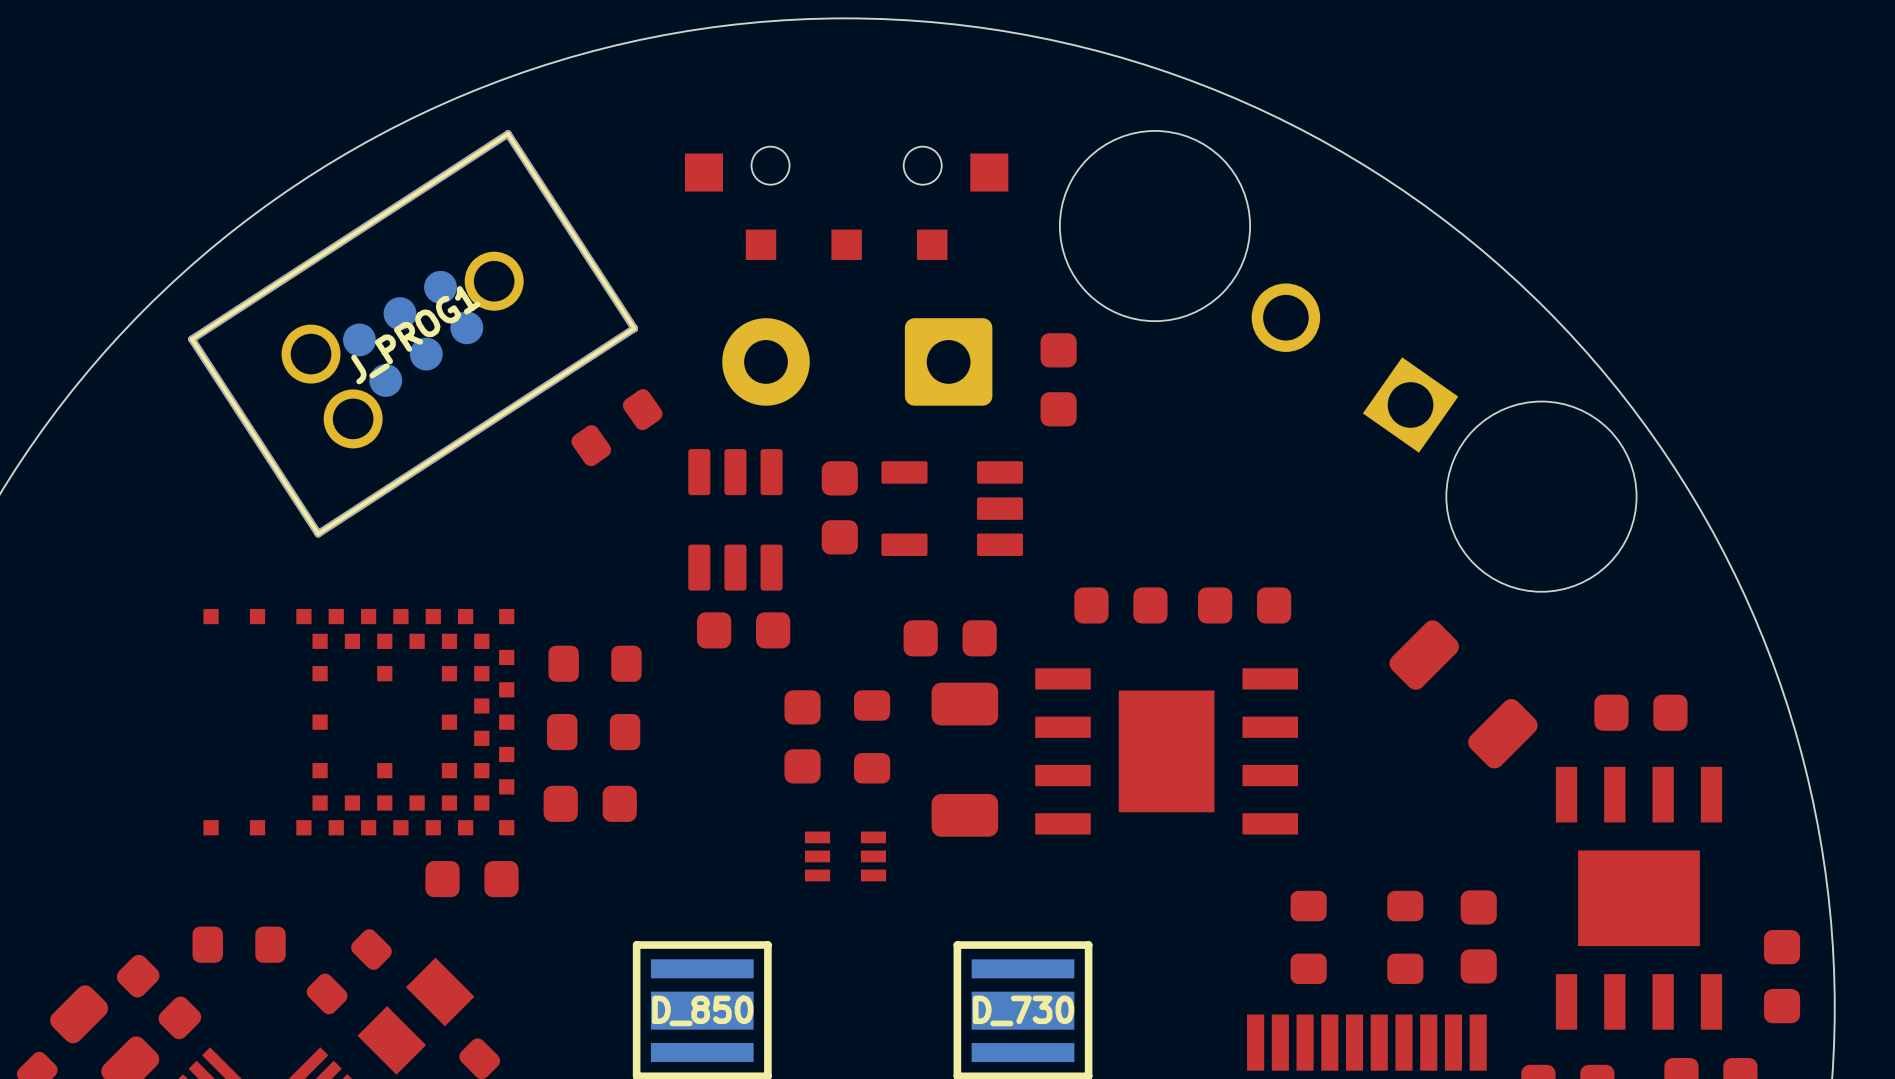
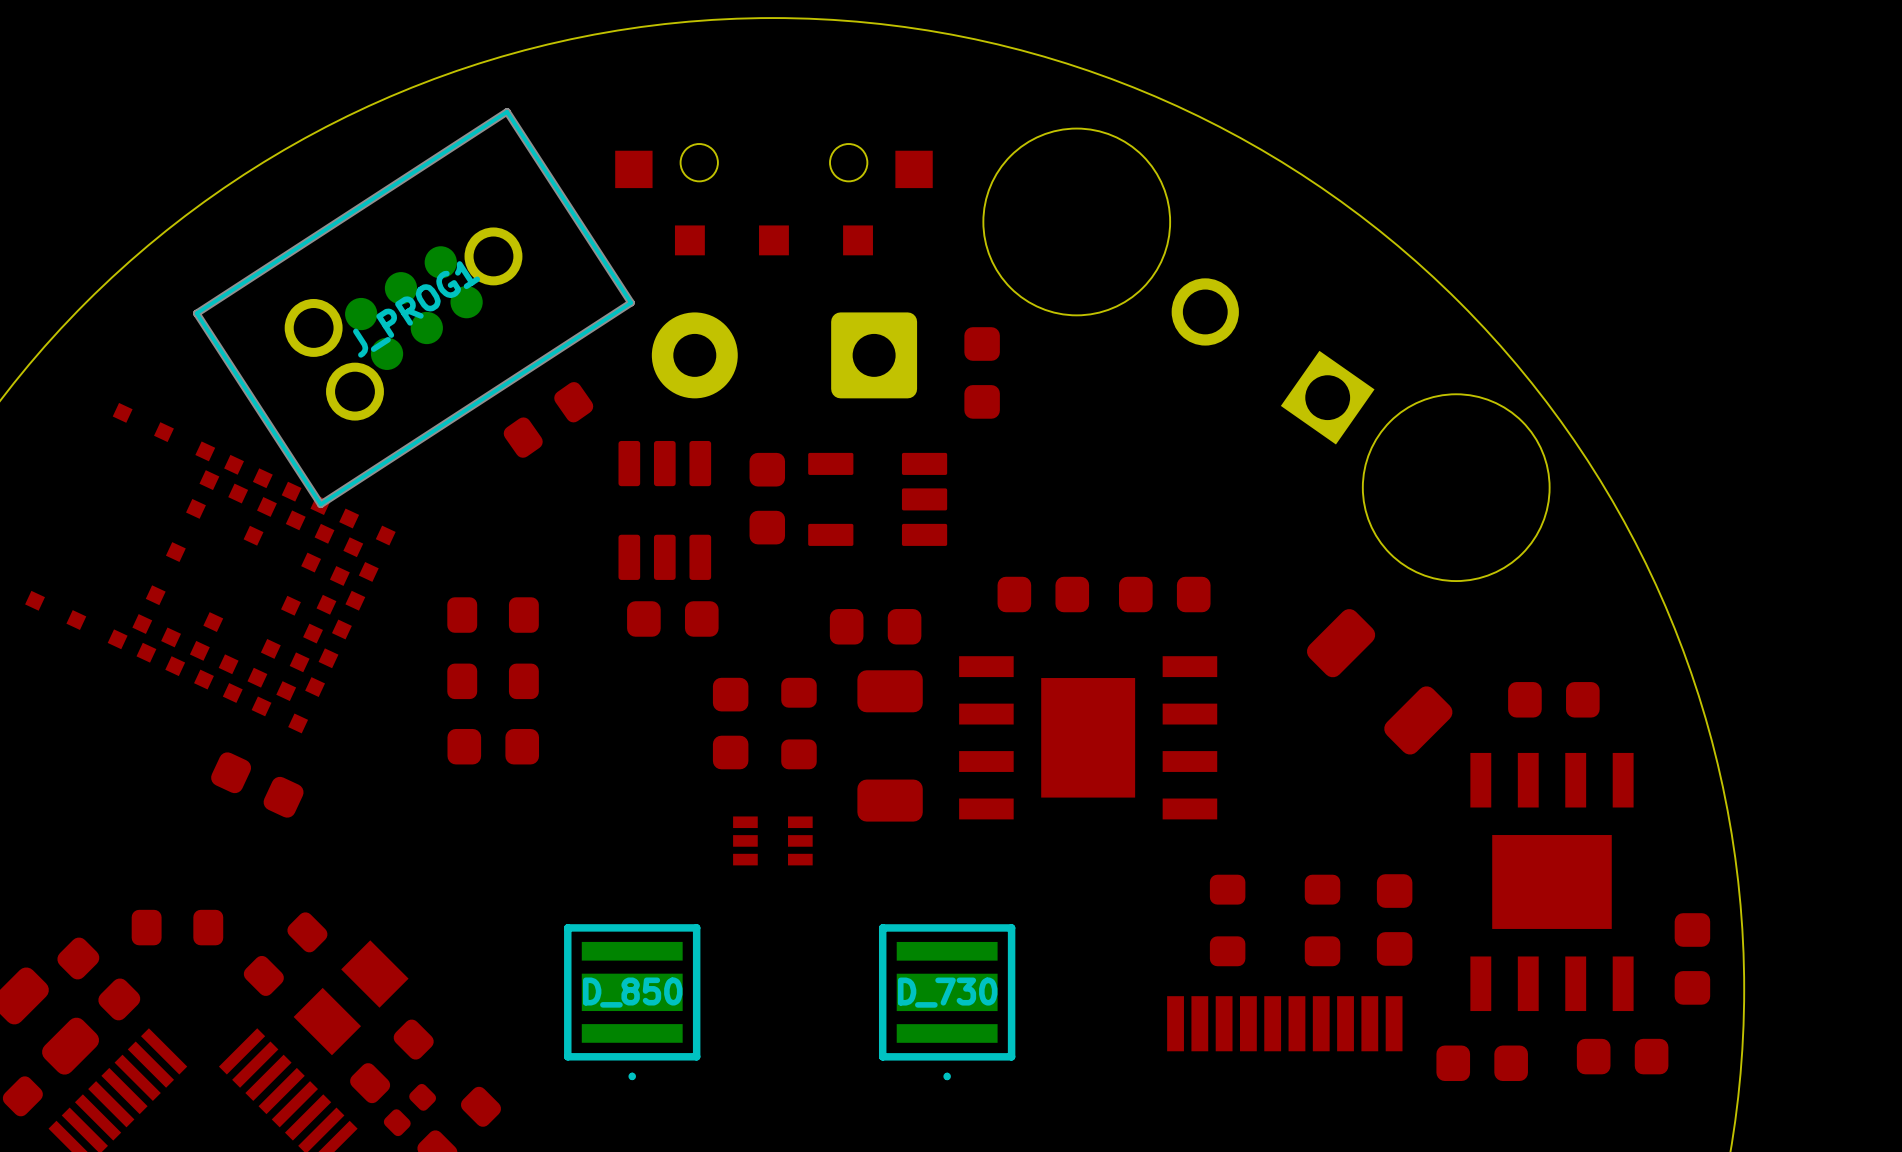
J_PROG1 position: (413, 333) -> (413, 308)
part: none -> (210, 568)
part: none -> (493, 615)
part: (595, 663) -> none
part: none -> (493, 681)
part: (358, 722) -> none
part: (593, 732) -> none
part: none -> (257, 785)
part position: (590, 803) -> (493, 746)
part: (472, 879) -> none

